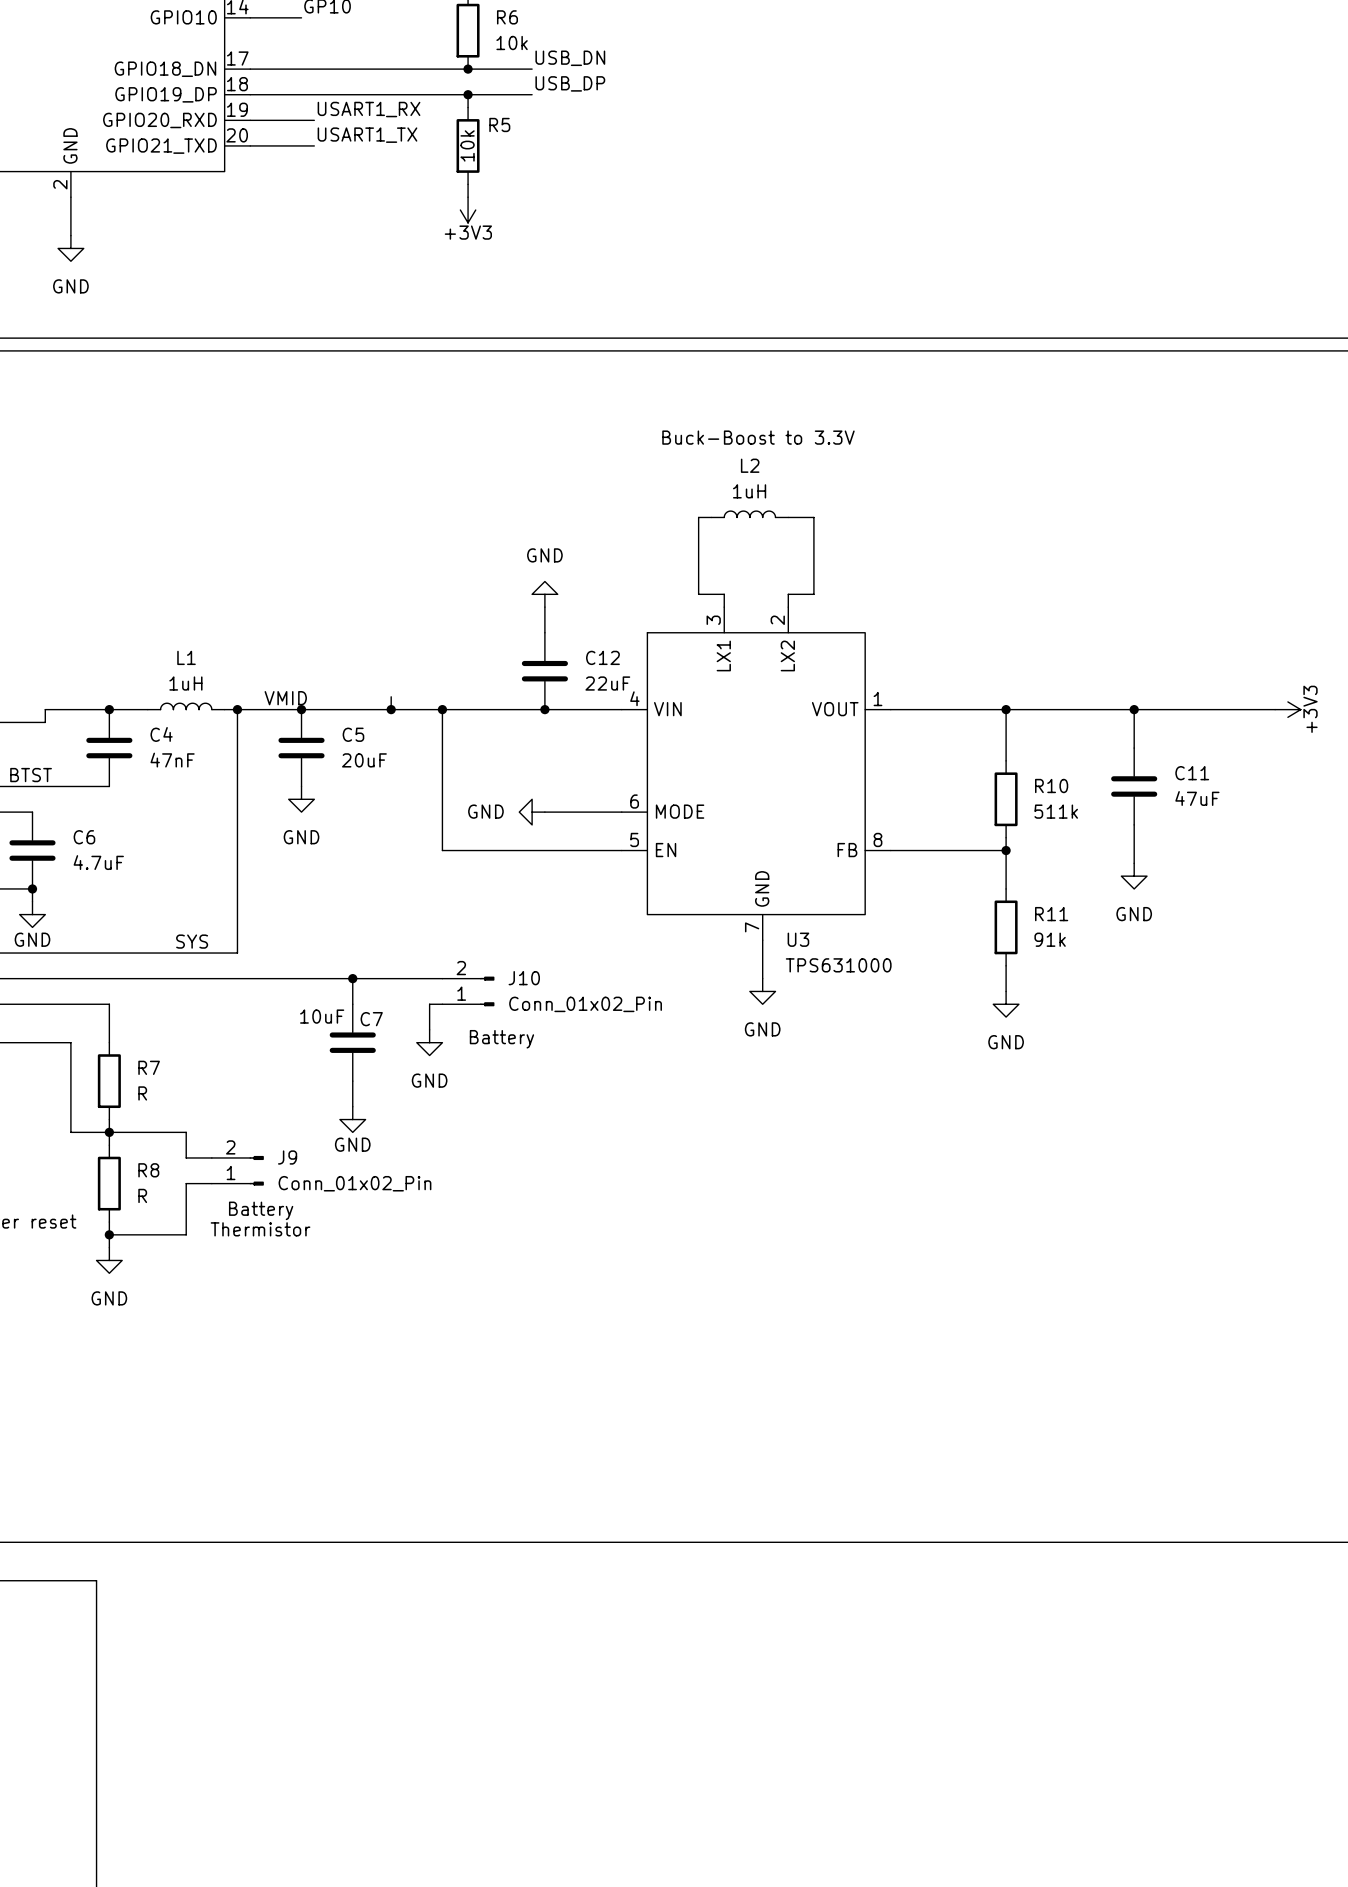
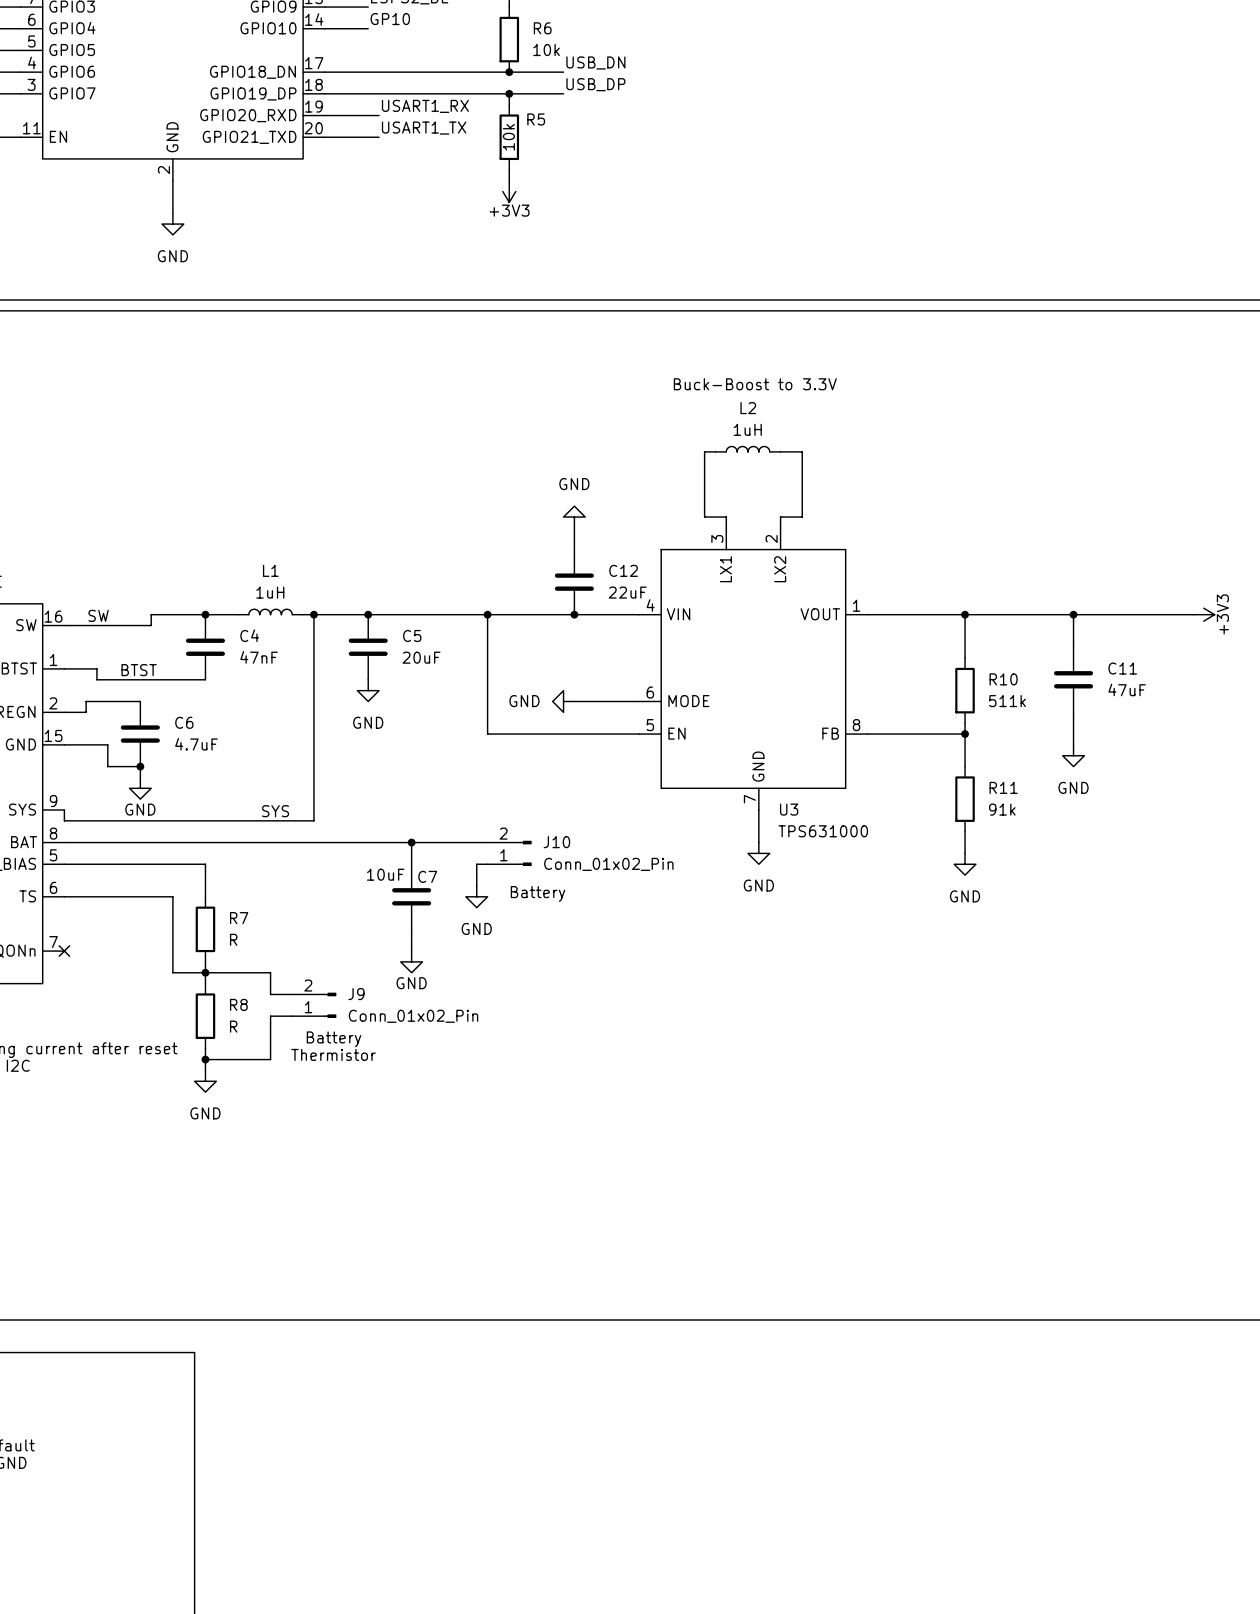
wire: (391, 696) (391, 709) -> none
label: VMID (285, 698) -> none
junction: (391, 709) -> none

